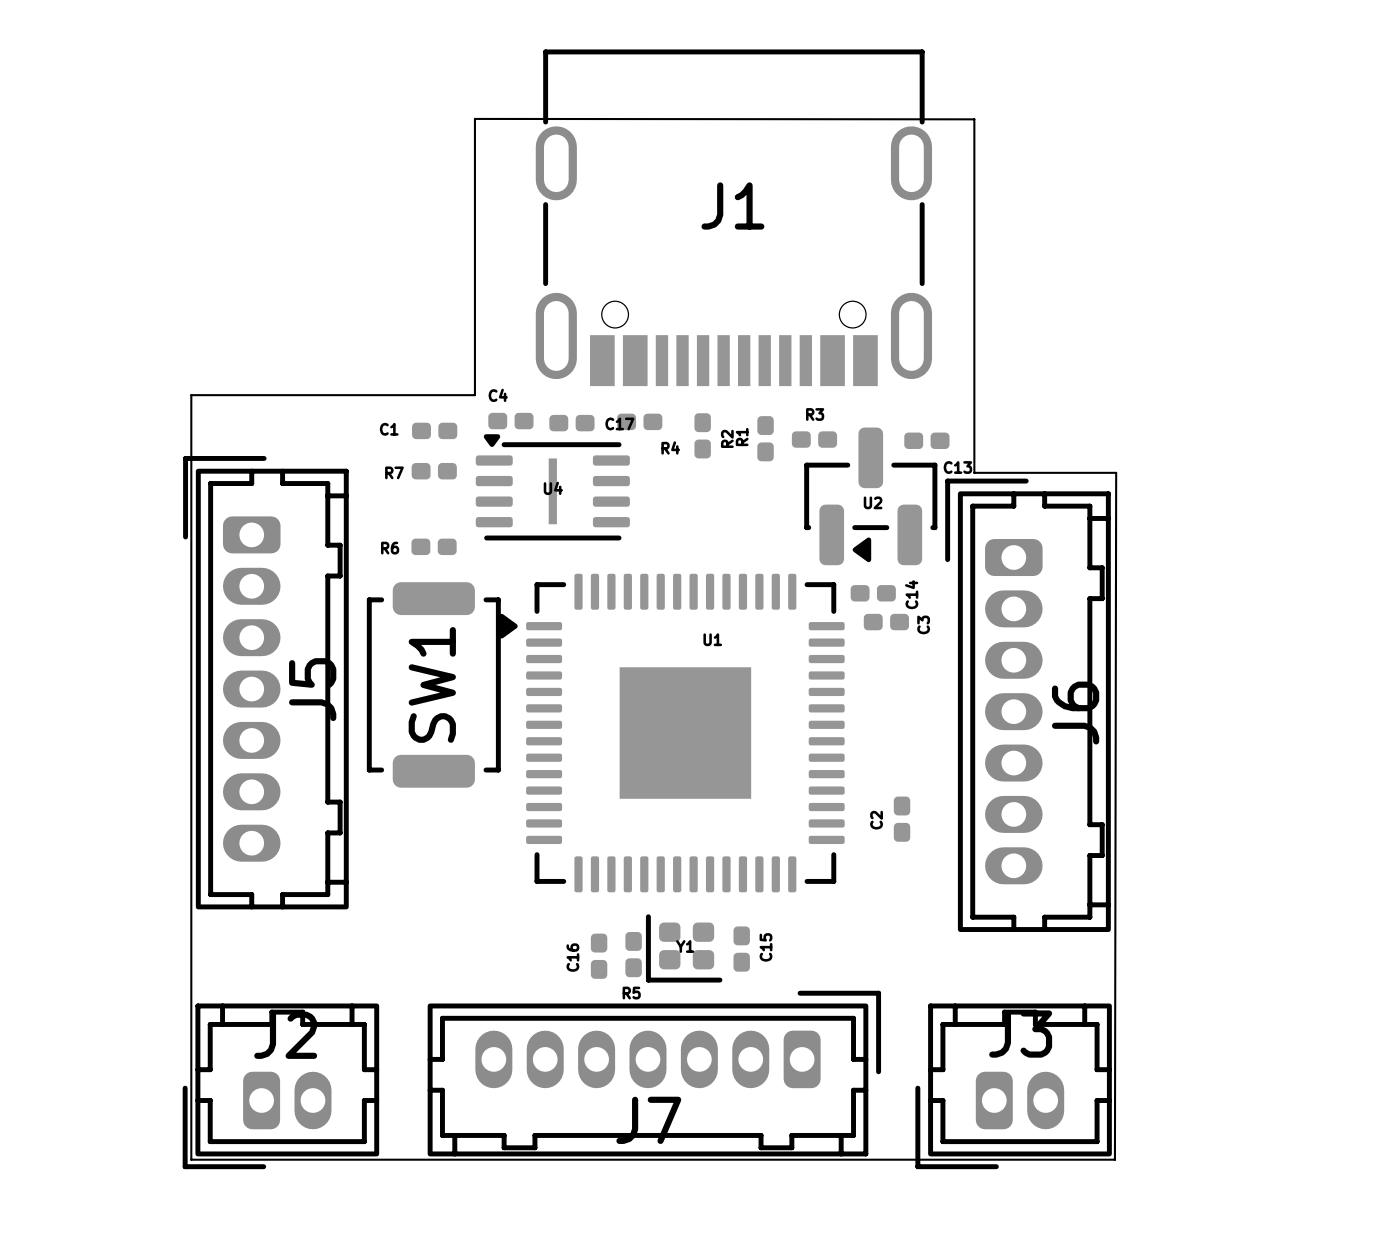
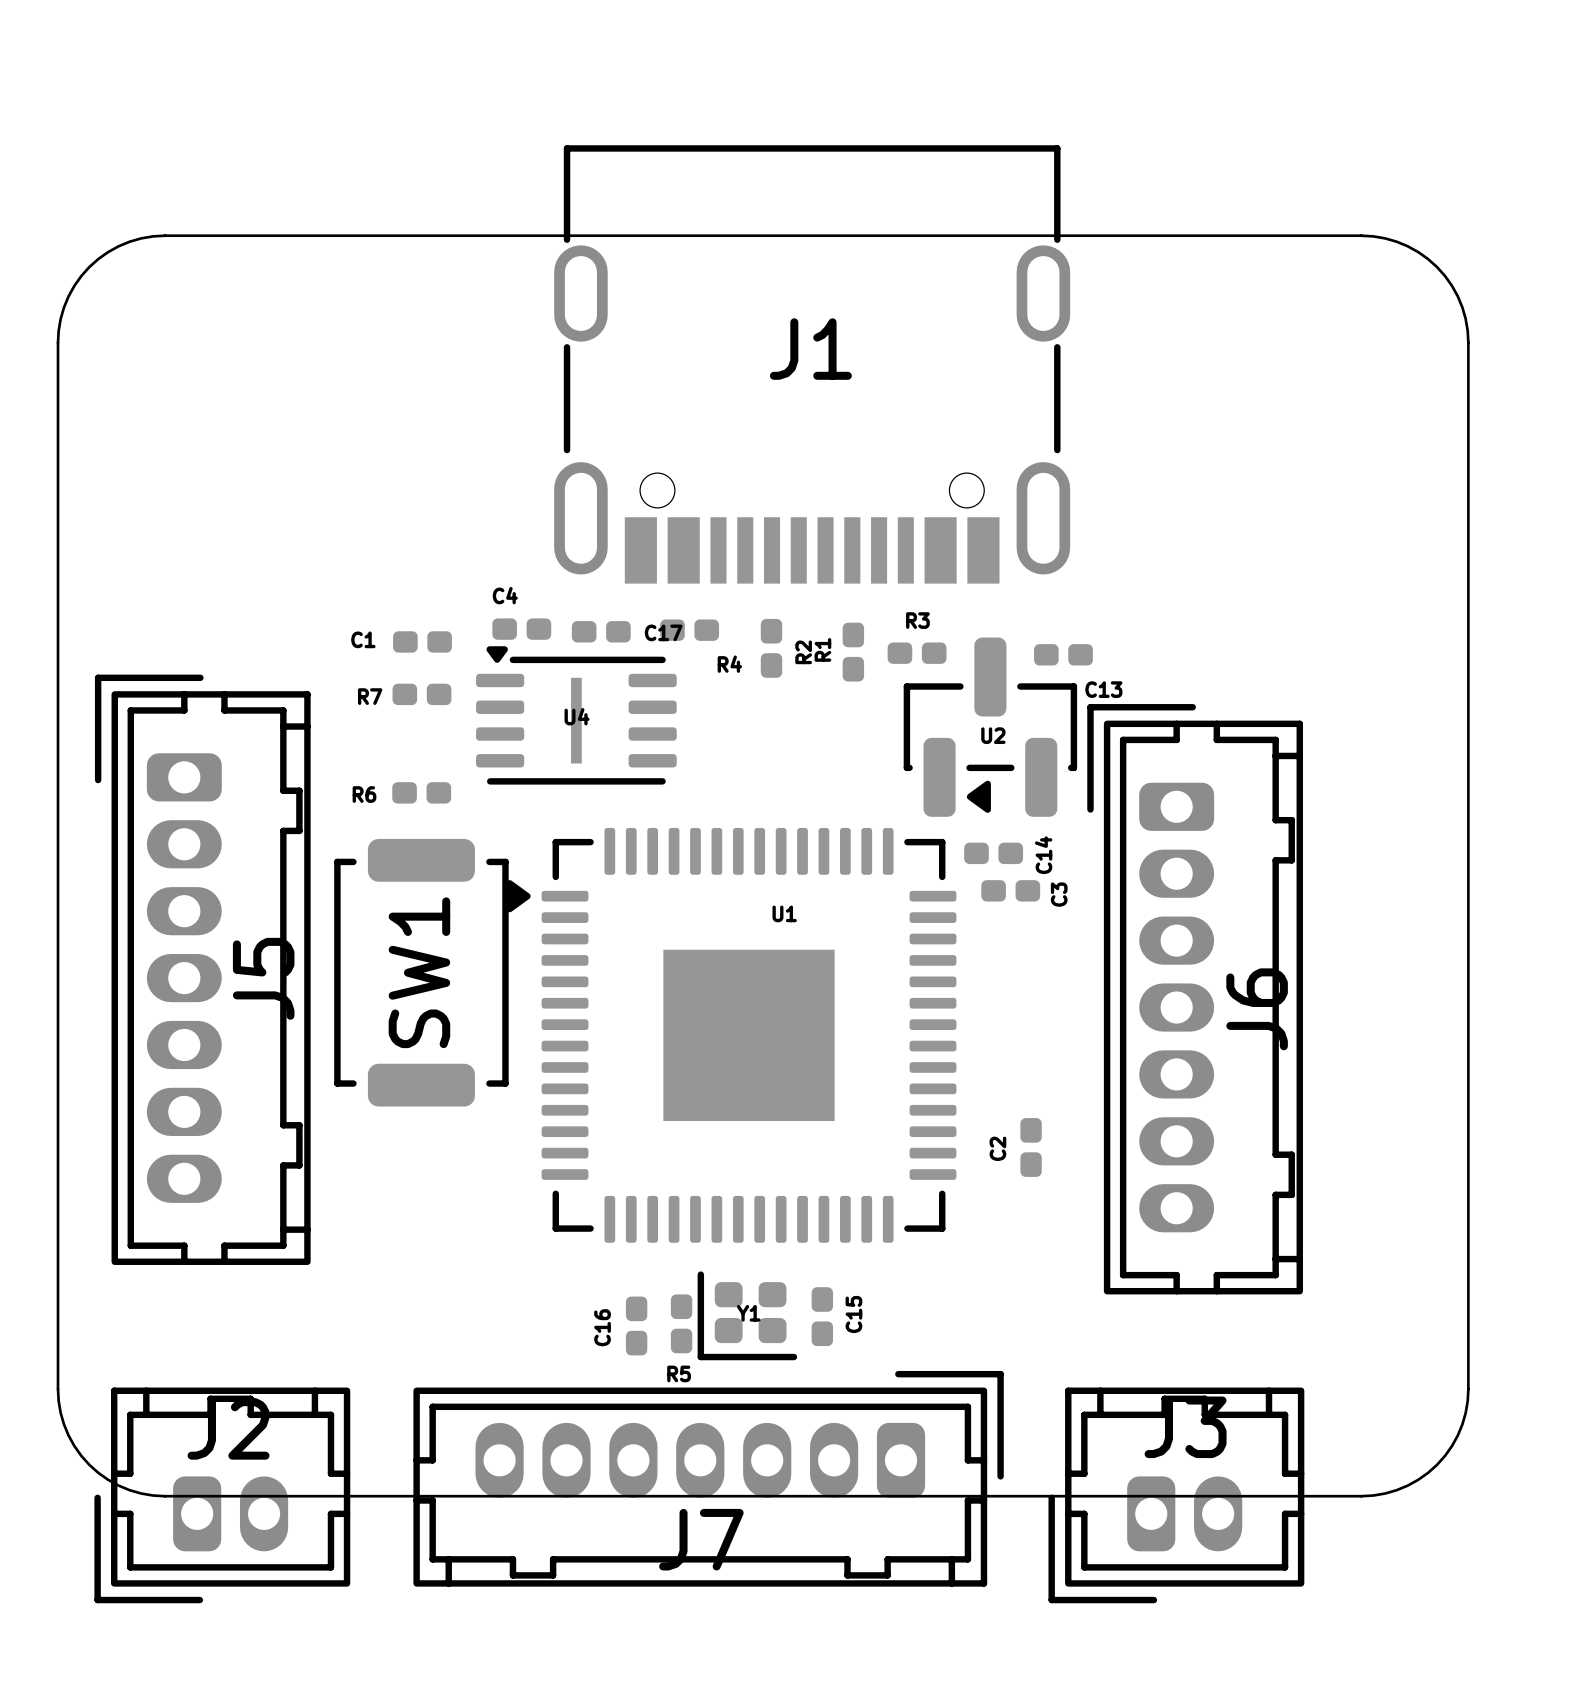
board edge: (474, 118) (974, 119) (974, 472) (1116, 472) (1114, 1159) (191, 1159) (191, 395) (474, 395) (474, 118) -> (165, 235) (129, 241) (98, 259) (81, 276) (68, 296) (58, 330) (58, 1389) (64, 1424) (74, 1446) (89, 1464) (108, 1479) (129, 1490) (165, 1496) (1361, 1496) (1396, 1490) (1418, 1479) (1437, 1464) (1451, 1446) (1462, 1424) (1468, 1389) (1468, 342) (1462, 307) (1451, 285) (1437, 267) (1418, 252) (1396, 241) (1361, 235) (165, 235)

